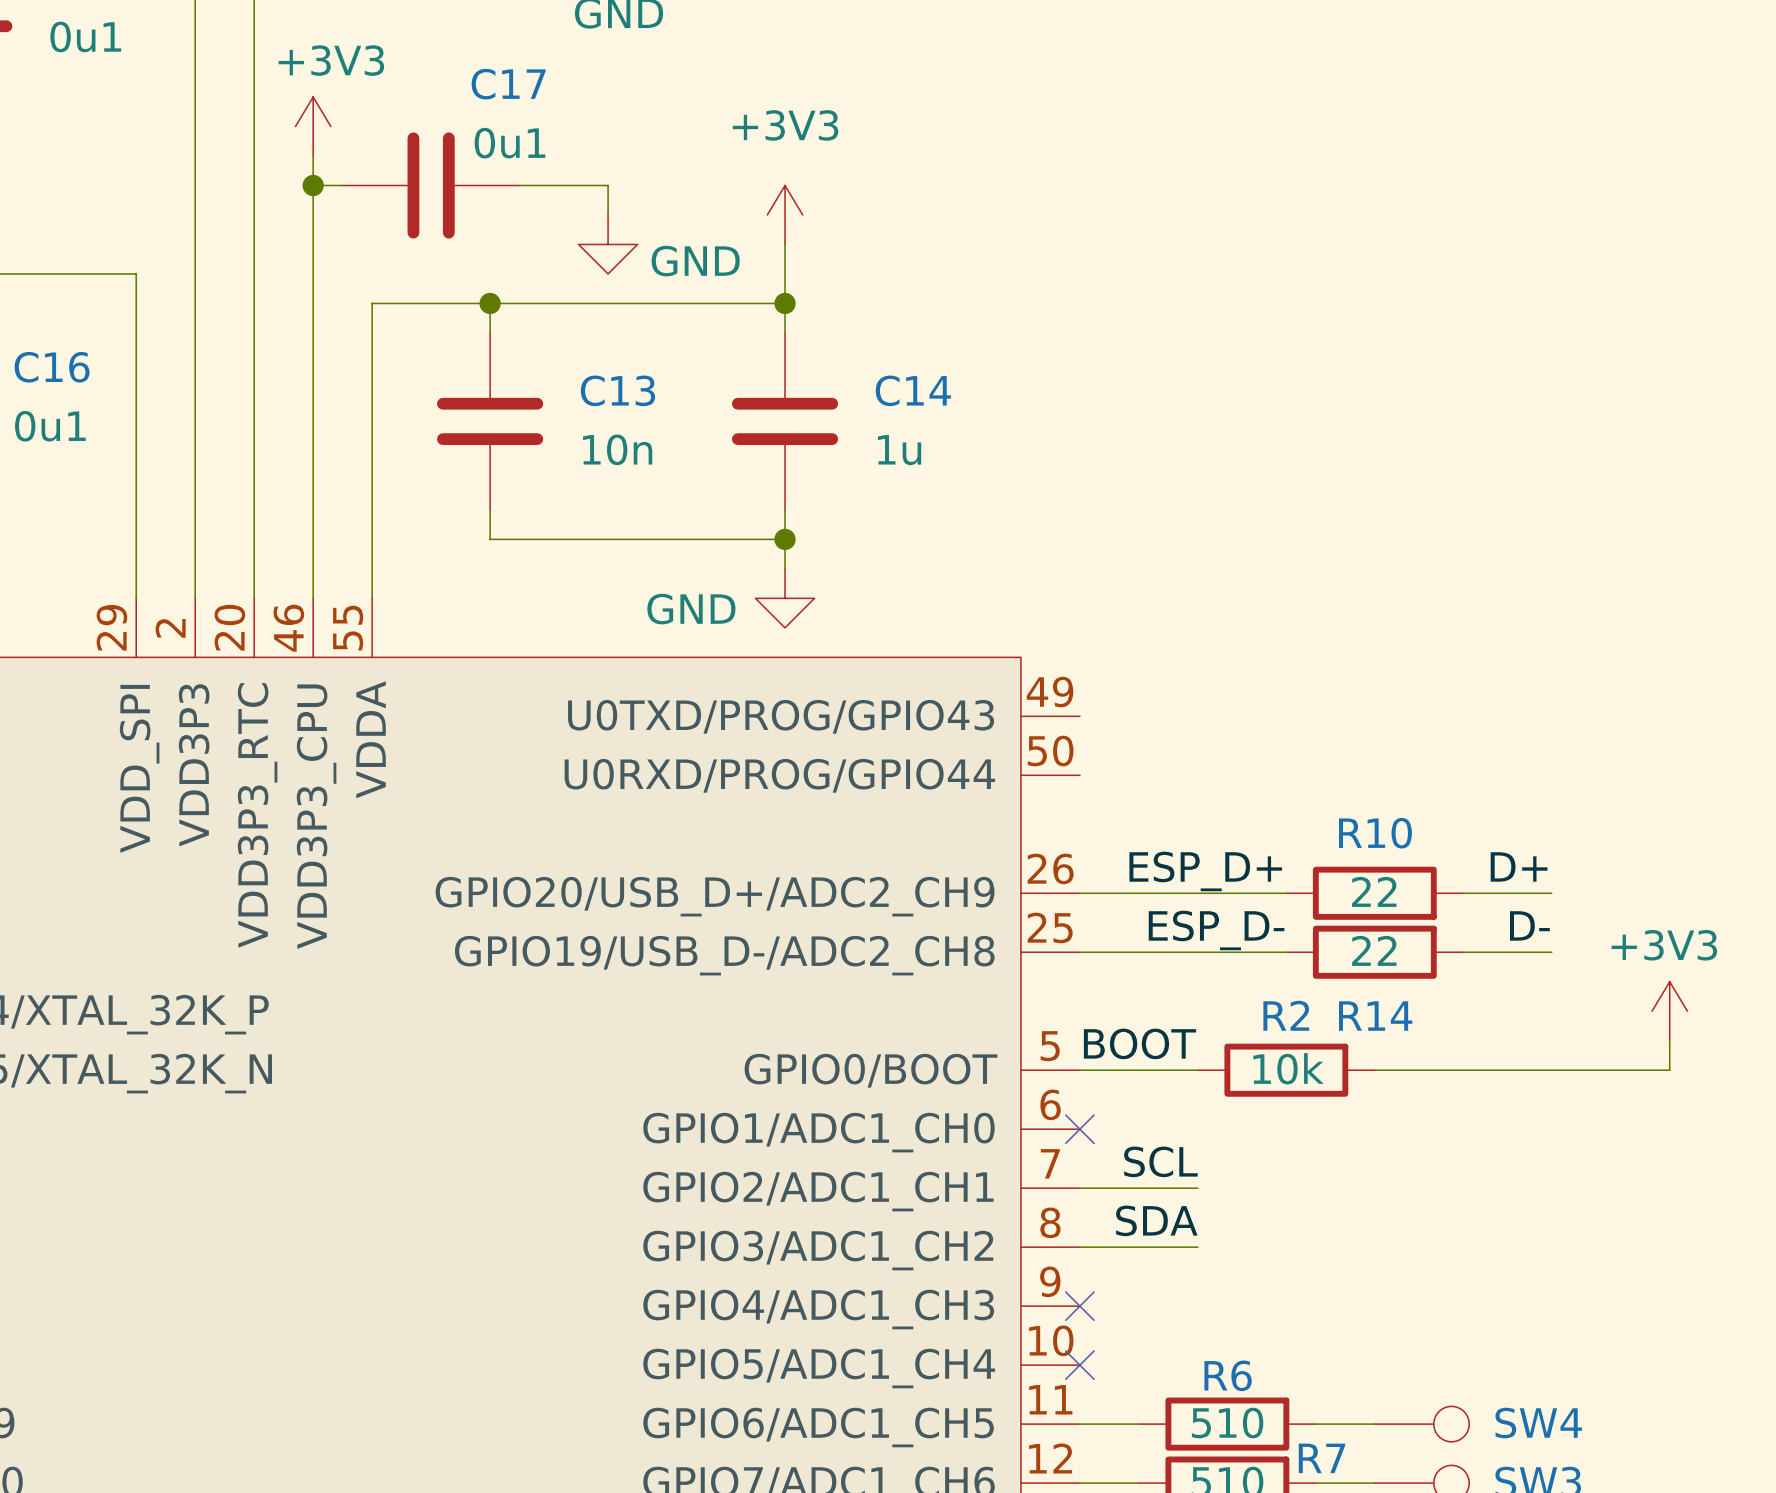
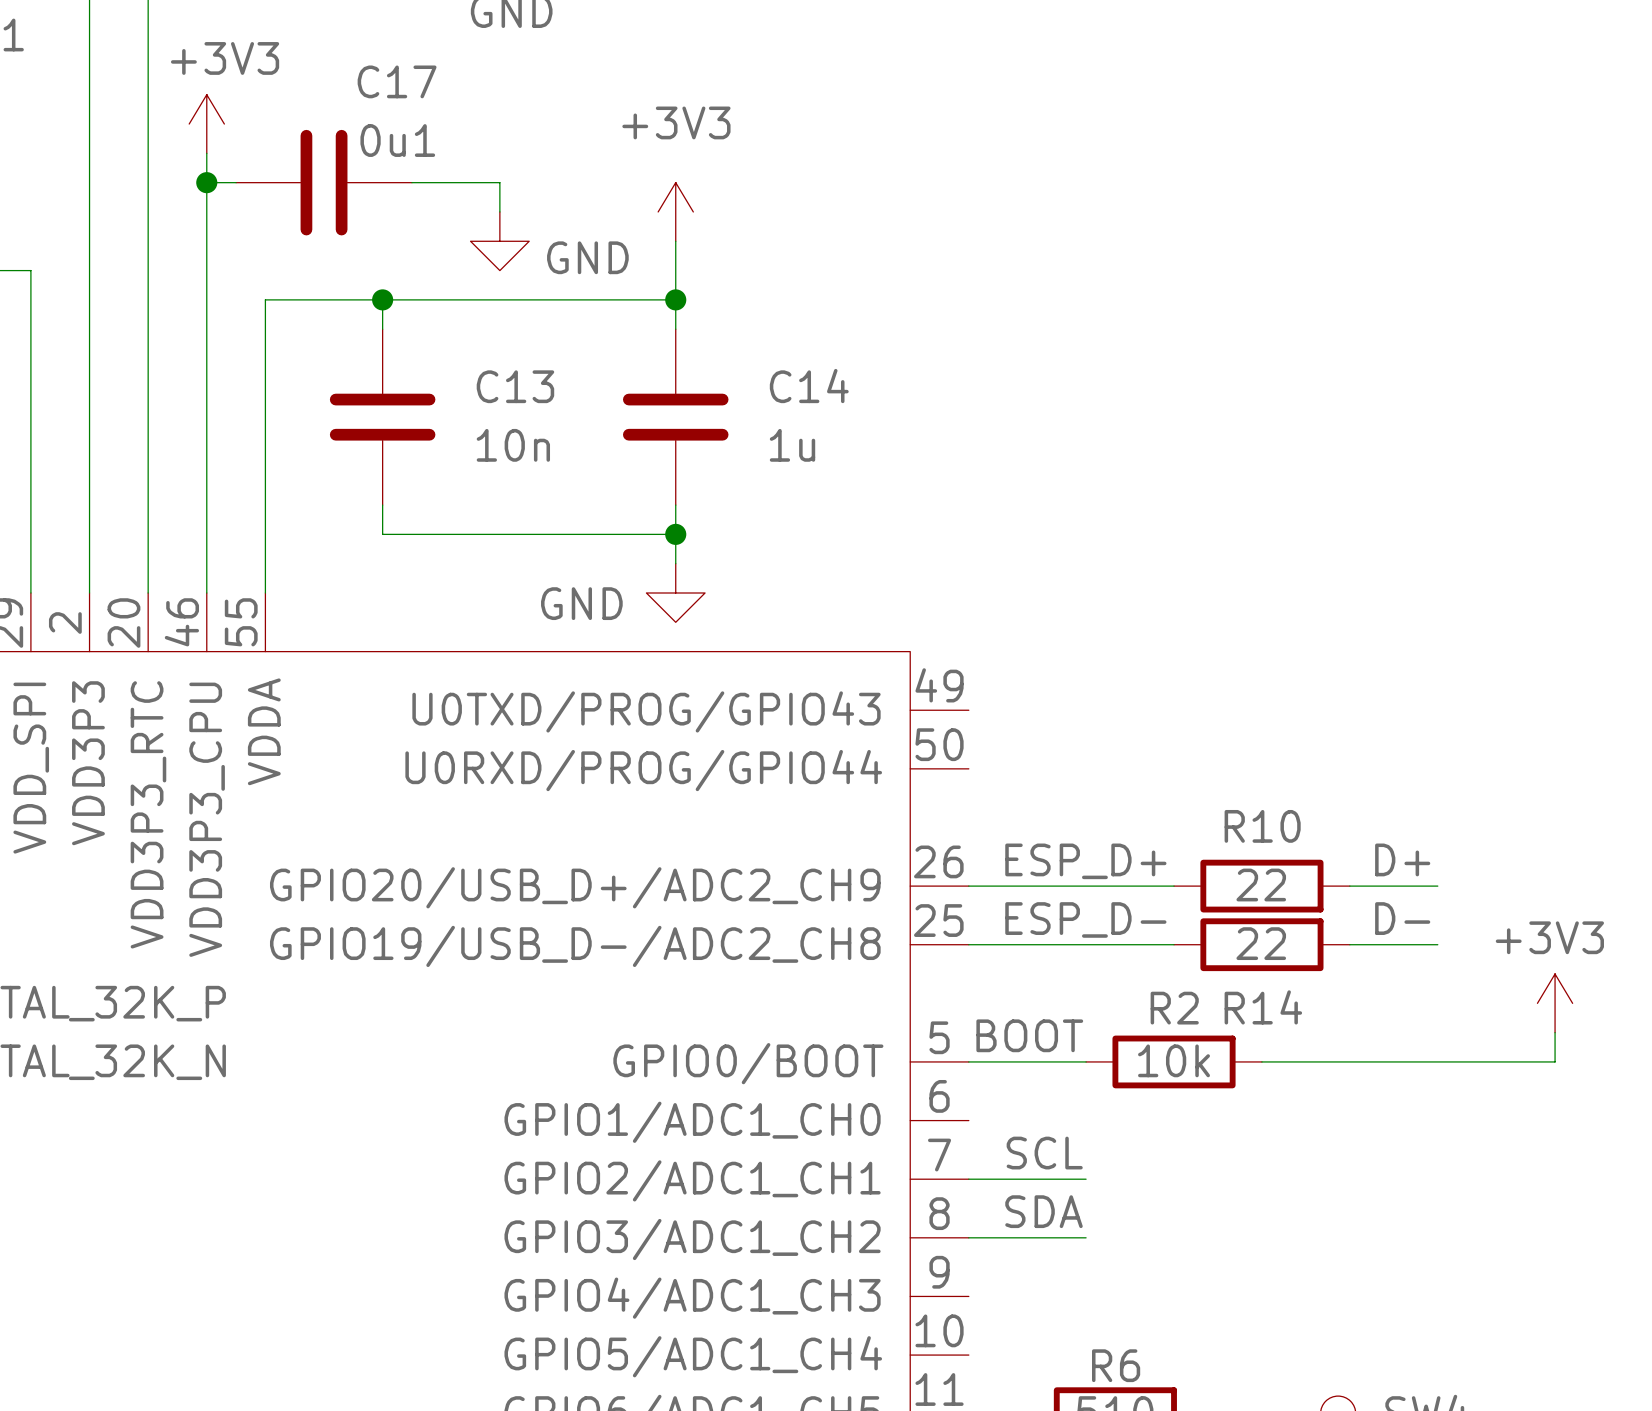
no-connect mark: (1079, 1129) -> none
no-connect mark: (1079, 1306) -> none
no-connect mark: (1079, 1365) -> none

